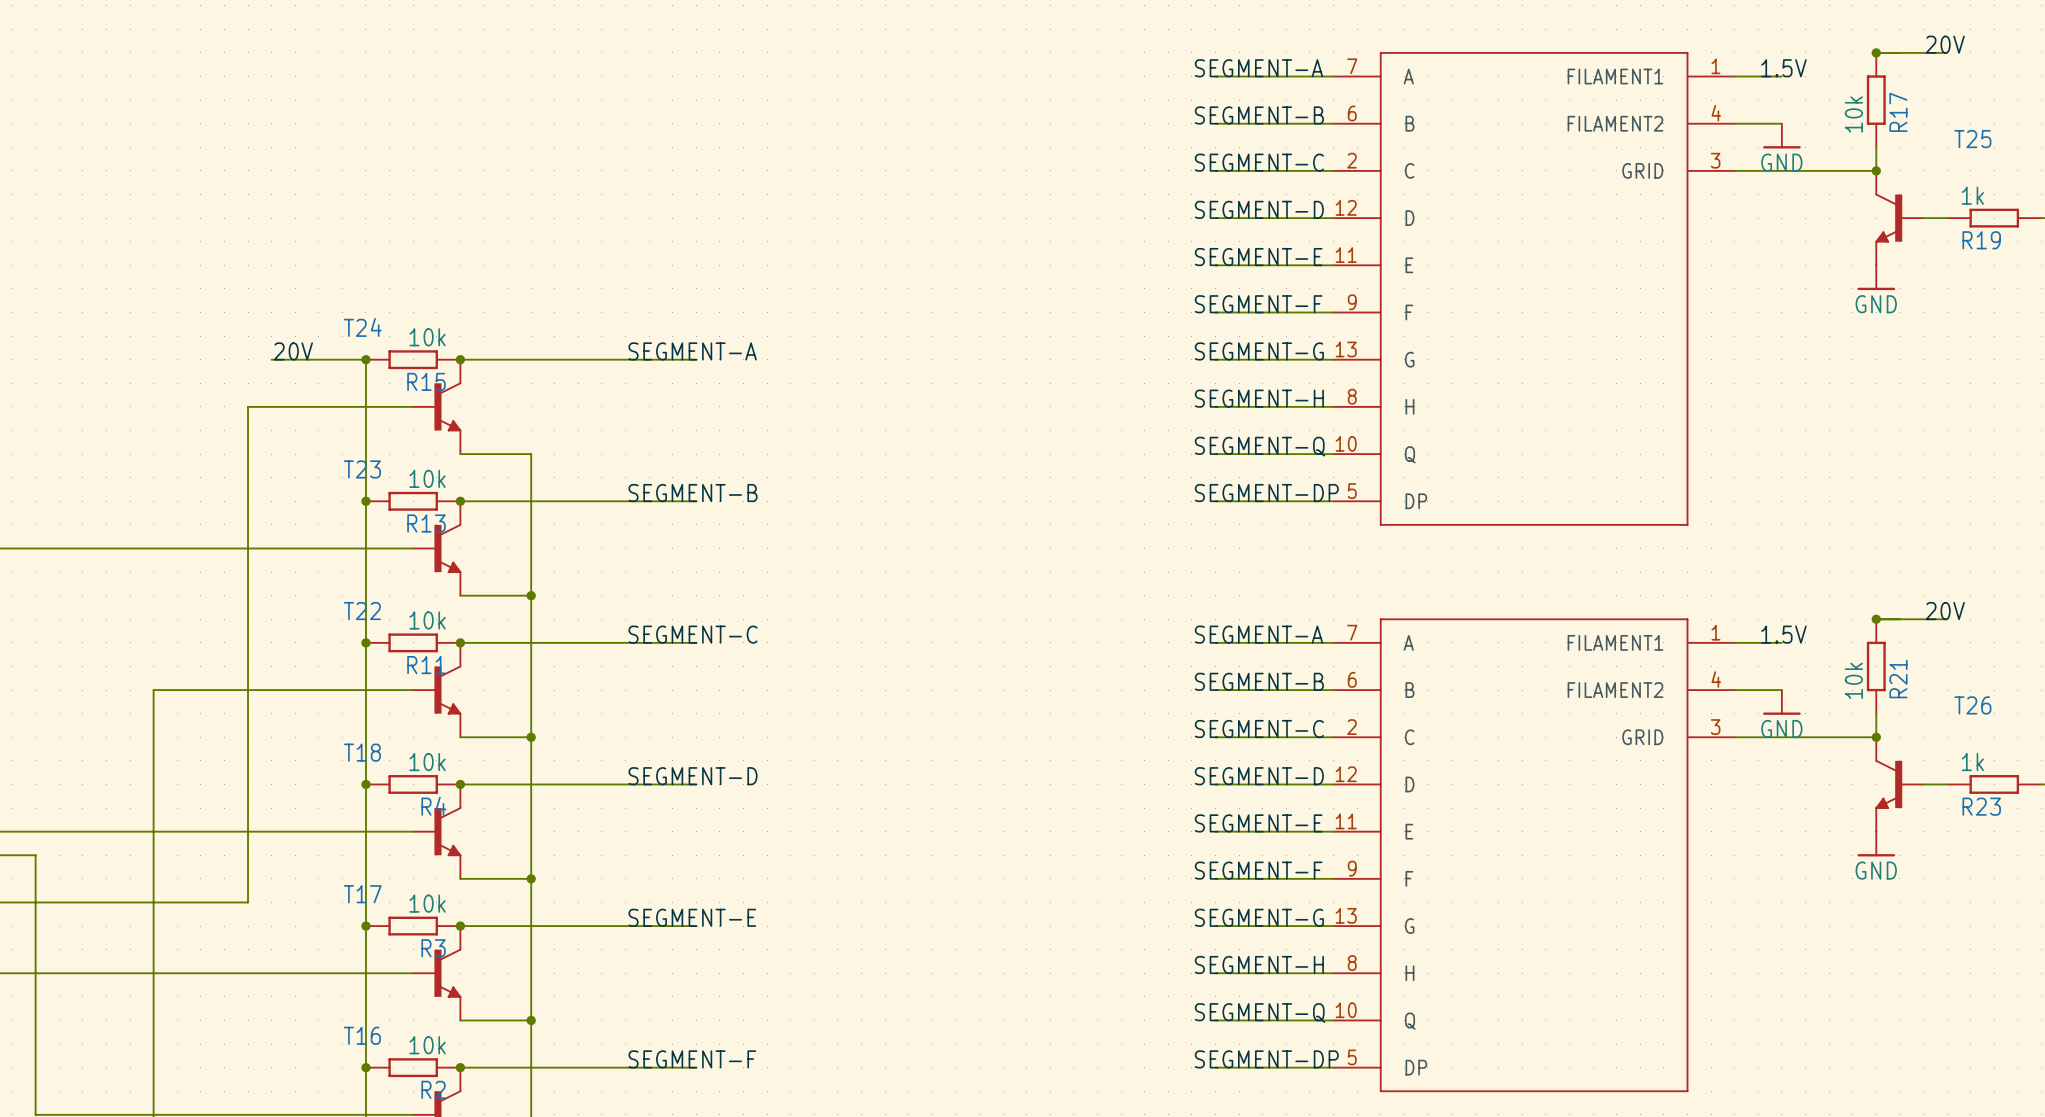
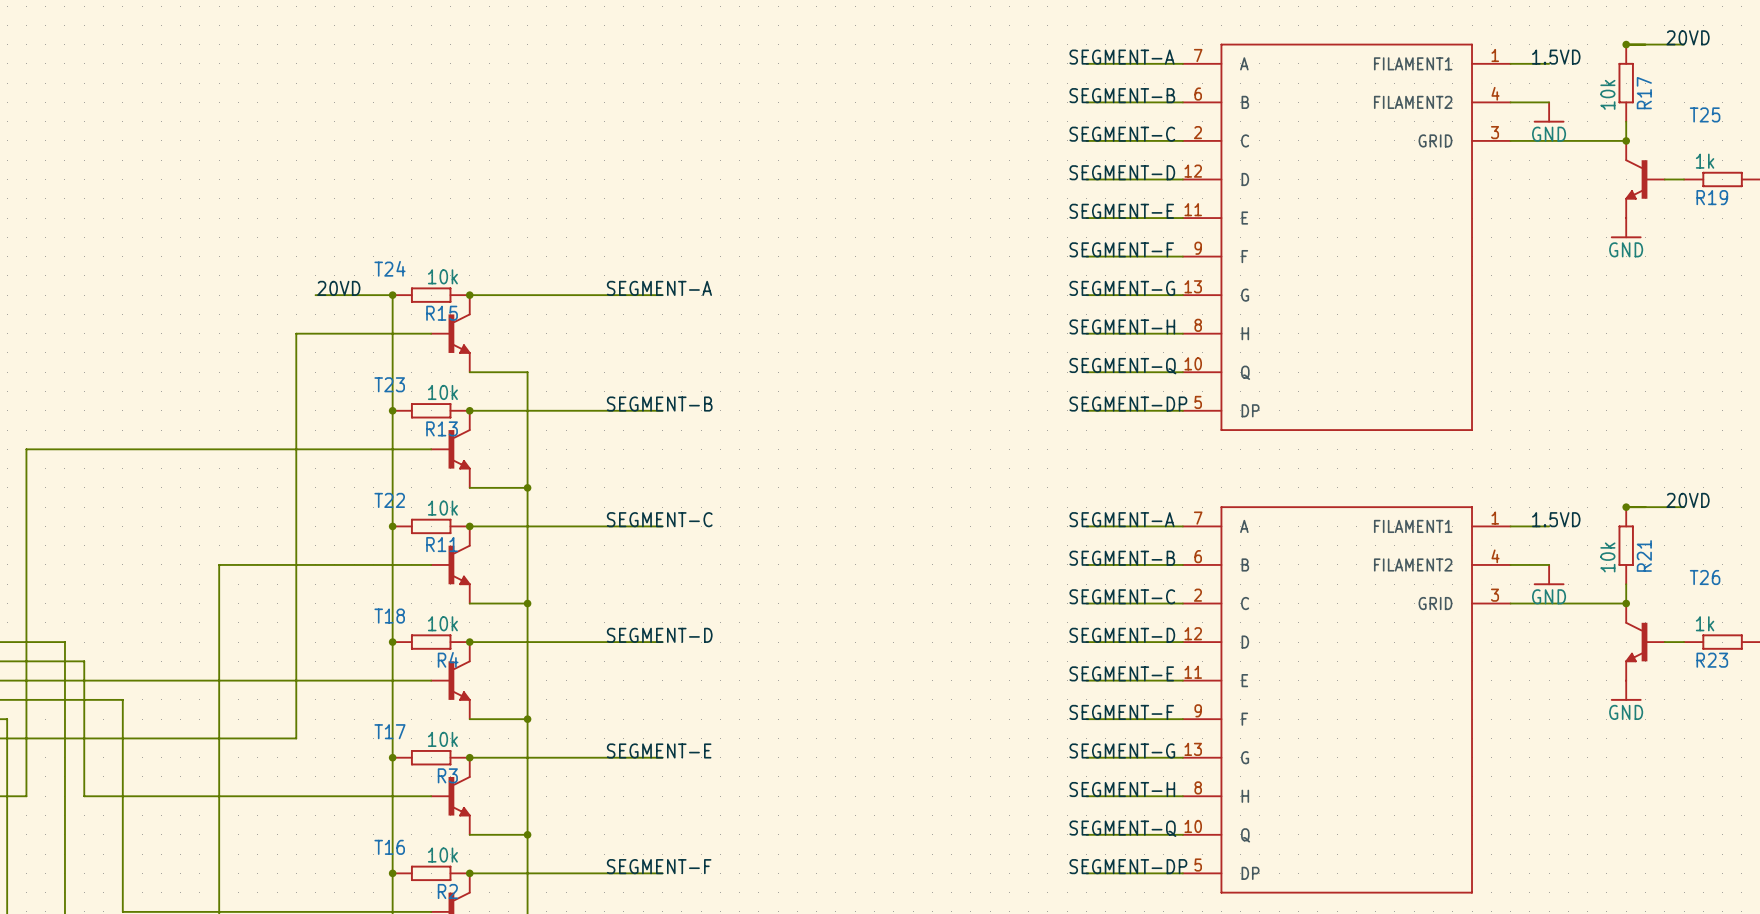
label: 20V (1945, 44) -> 20VD (1688, 37)
label: 1.5V (1783, 68) -> 1.5VD (1556, 57)
label: 20V (293, 351) -> 20VD (338, 288)
label: 20V (1945, 611) -> 20VD (1688, 500)
label: 1.5V (1783, 634) -> 1.5VD (1556, 519)

